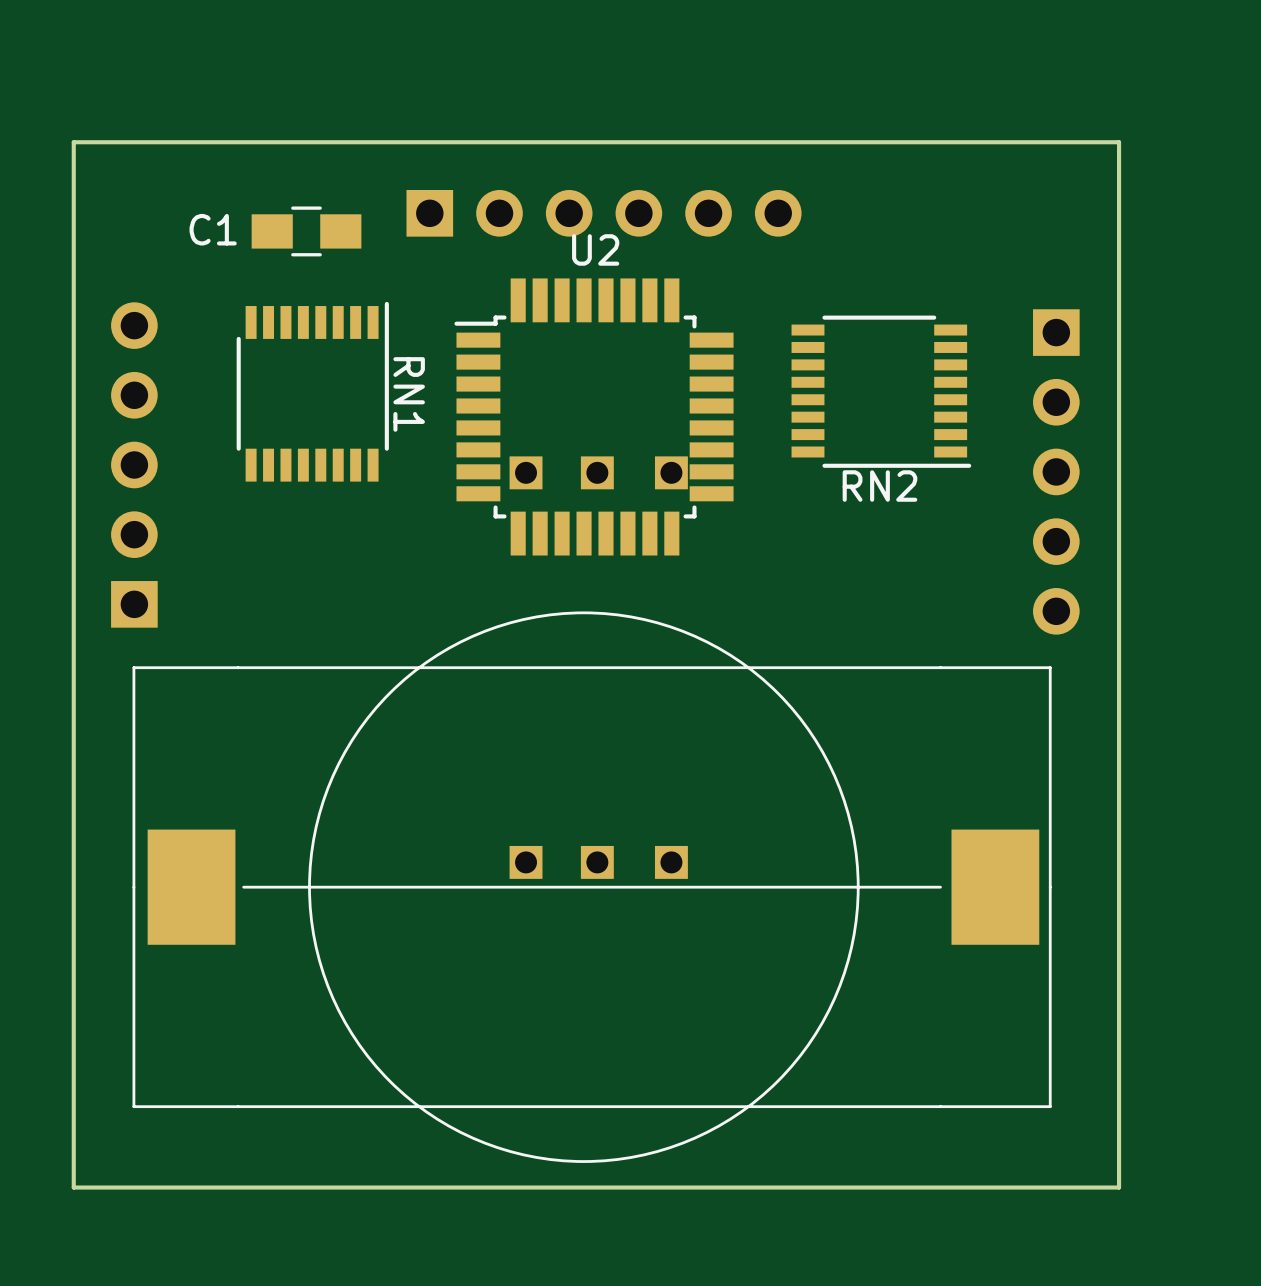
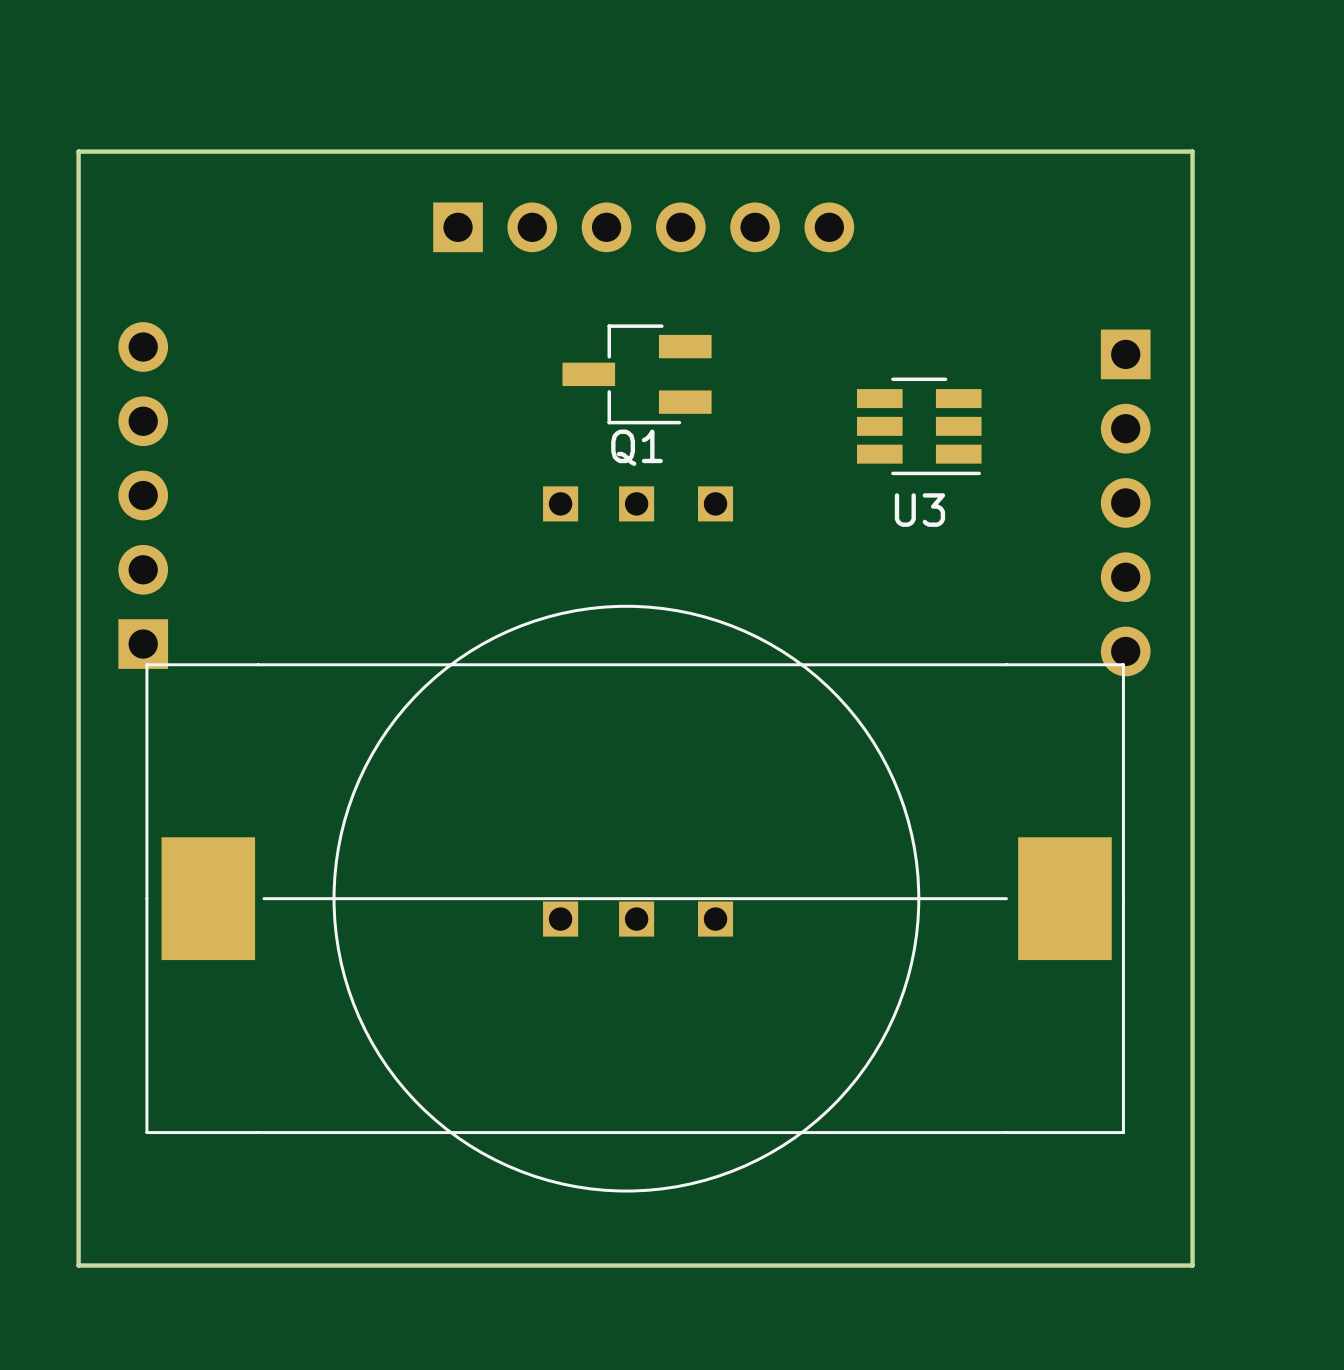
C1: (306, 231) -> none
Q1: none -> (637, 374)
RN1: (312, 391) -> none
RN2: (881, 391) -> none
U3: none -> (919, 426)
U2: (593, 416) -> none
part position: (592, 887) -> (635, 898)

